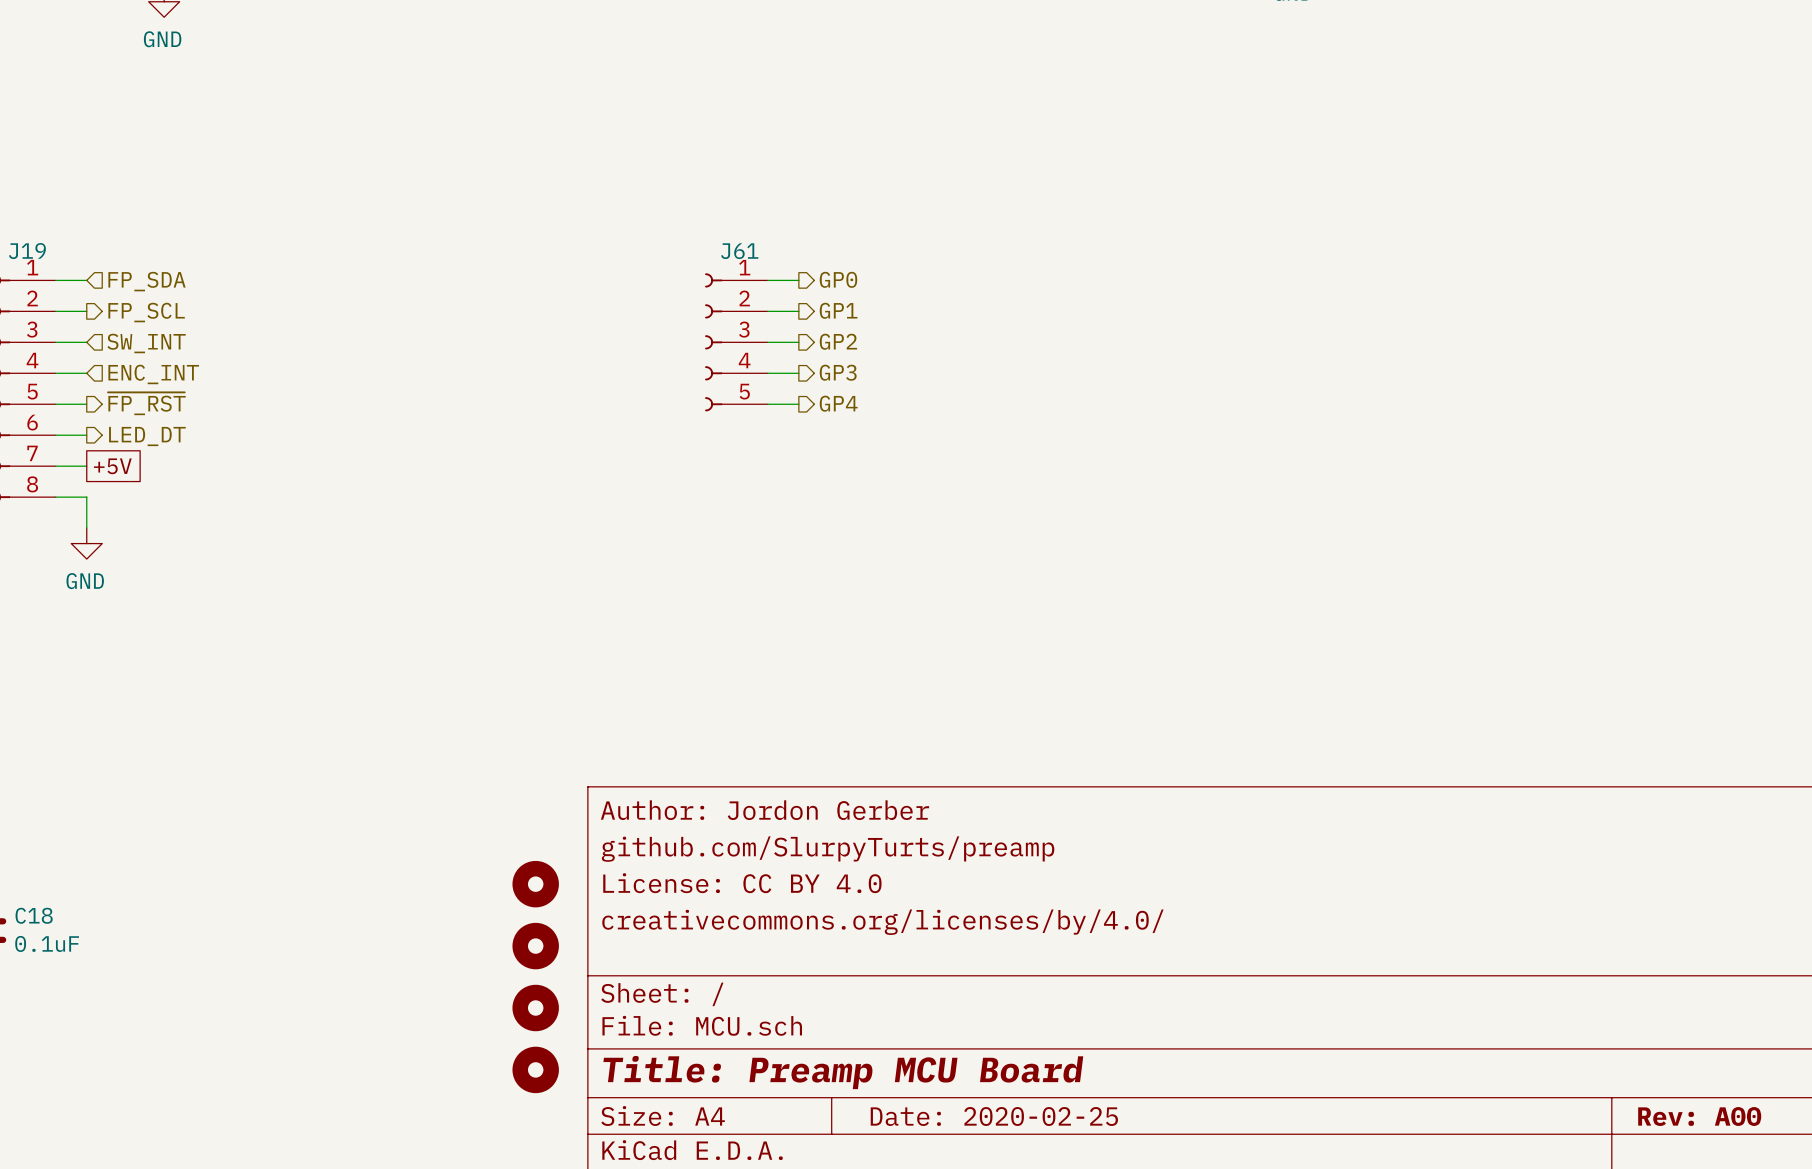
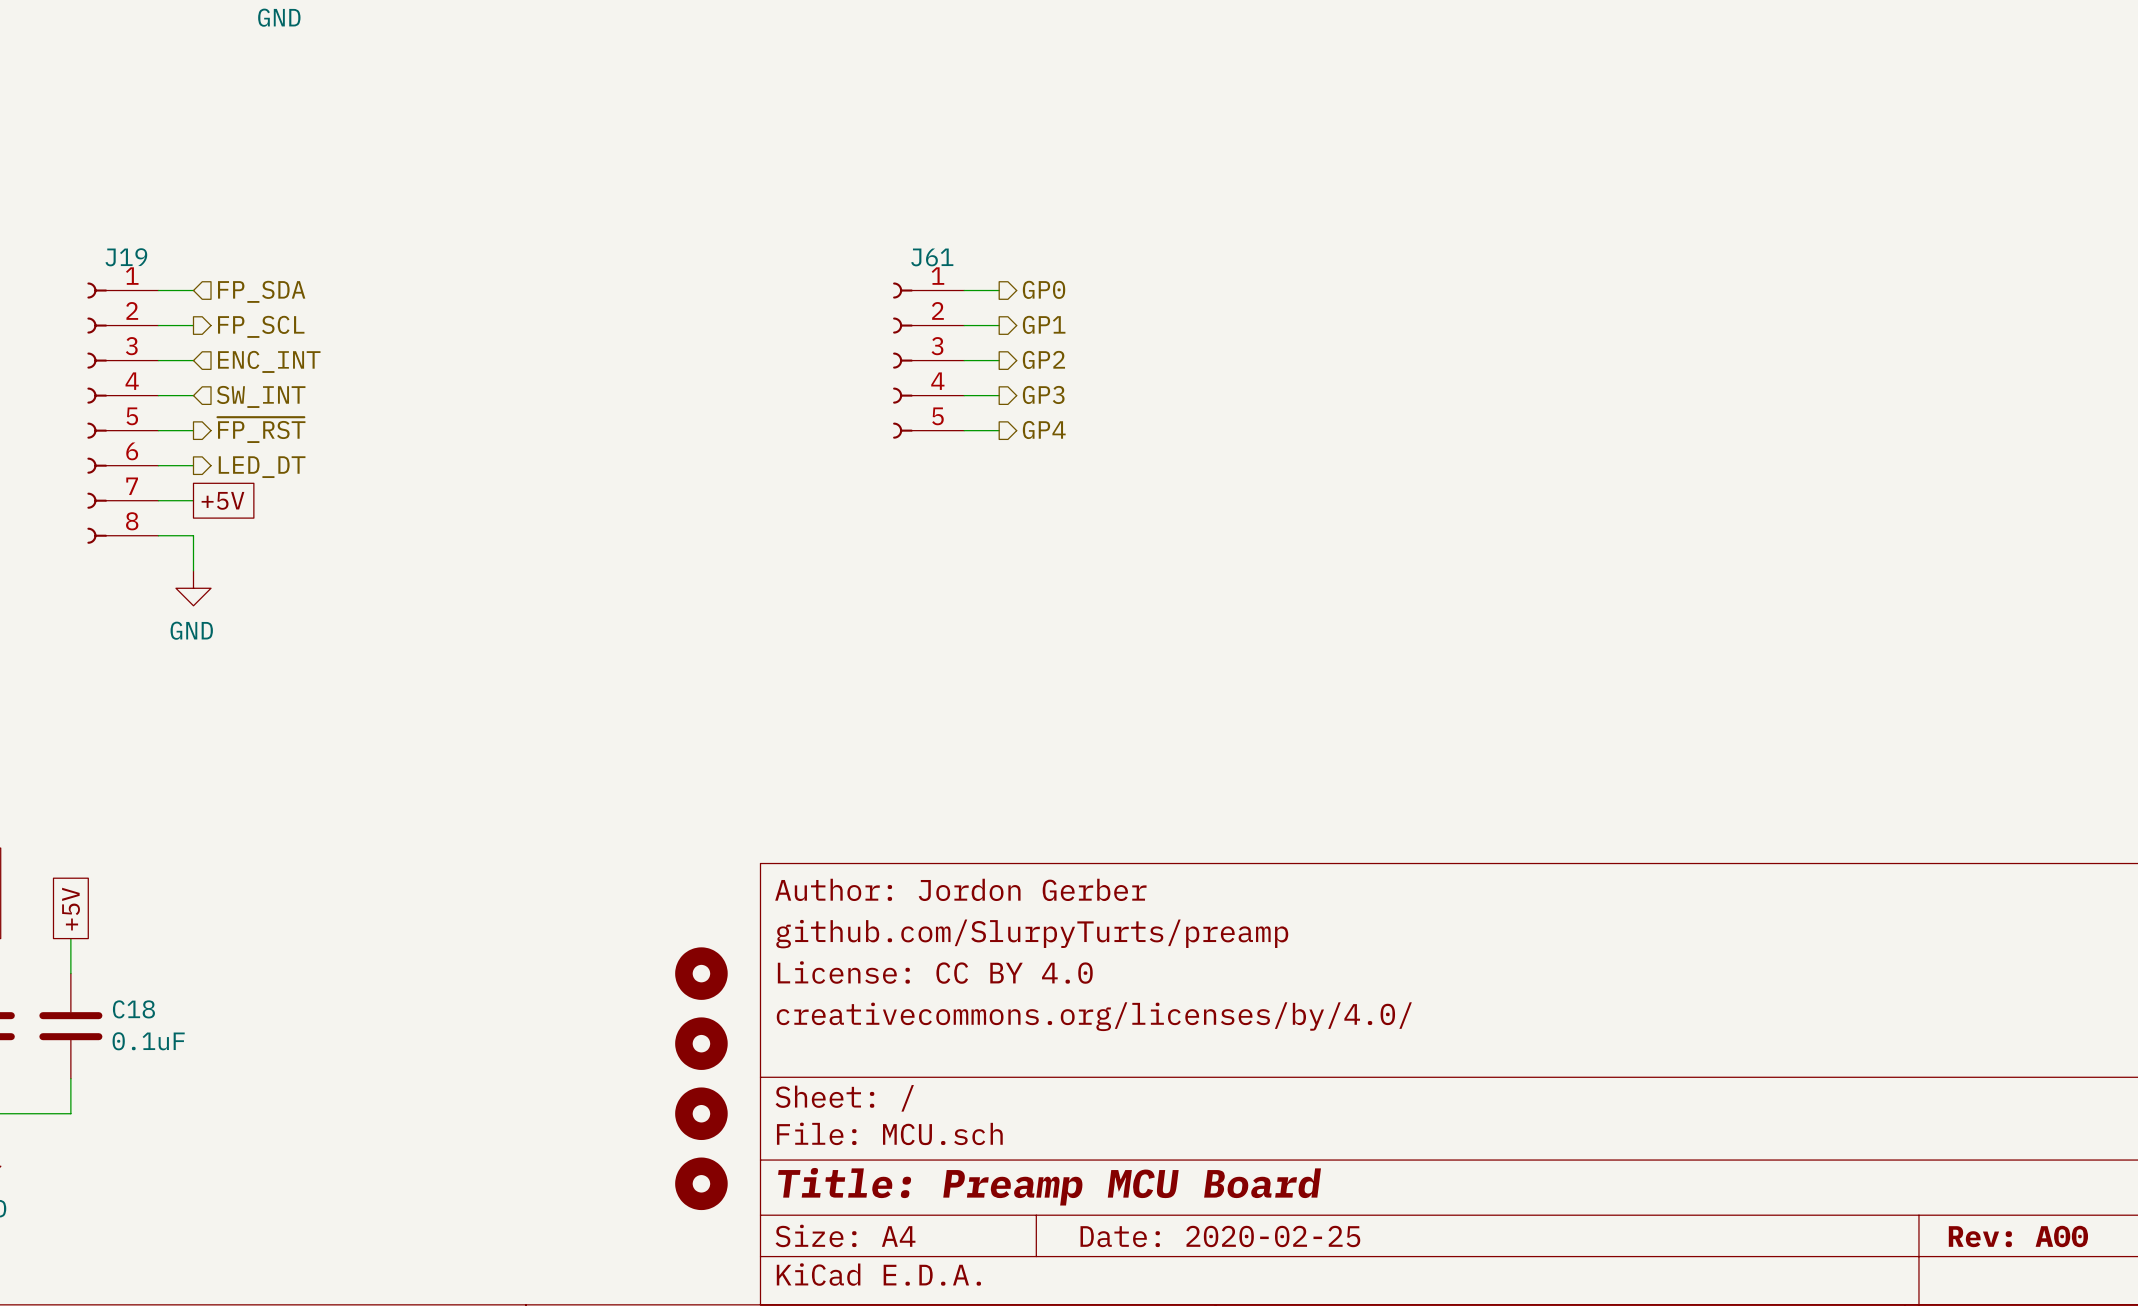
hierarchical label: SW_INT (146, 343) -> ENC_INT (269, 361)
hierarchical label: ENC_INT (153, 374) -> SW_INT (261, 396)

